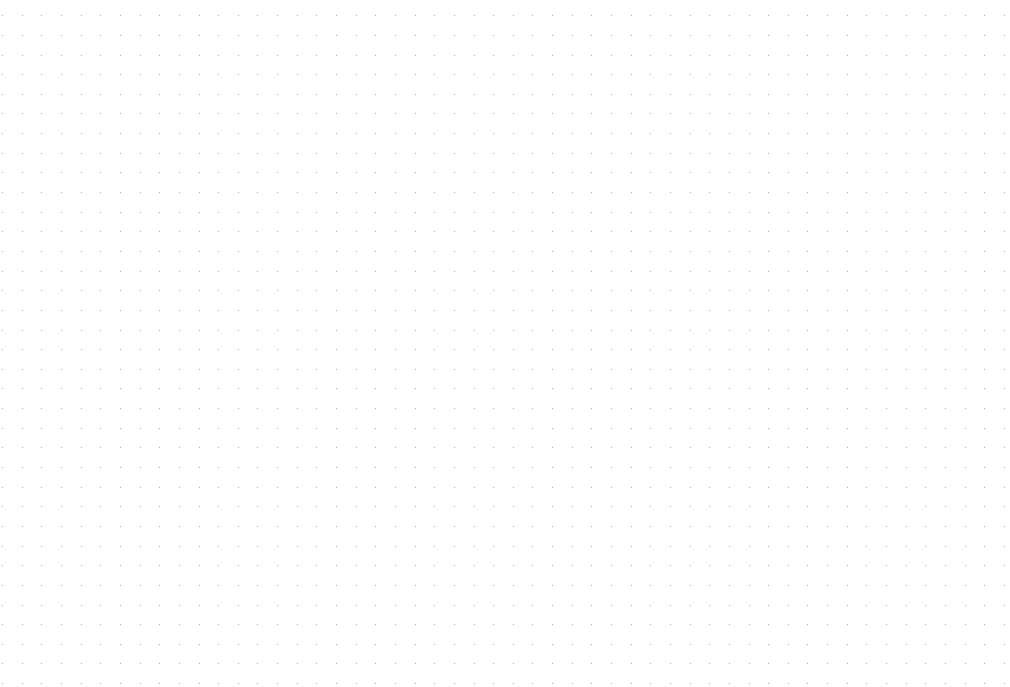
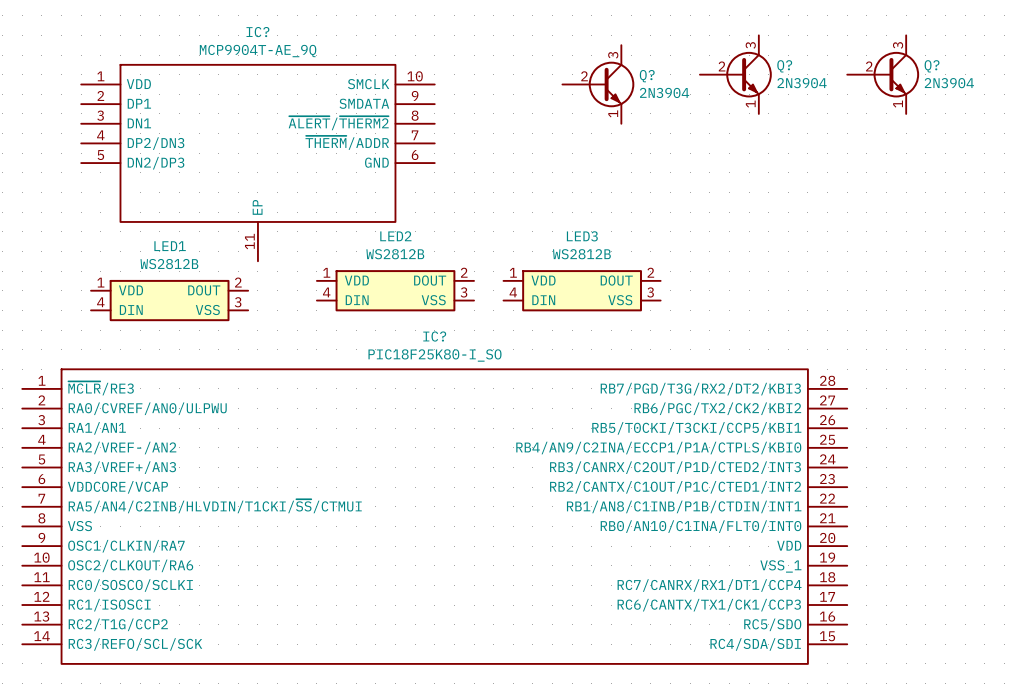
Q?: none -> 2N3904 (735, 74)
Q?: none -> 2N3904 (883, 74)
Q?: none -> 2N3904 (598, 84)
IC?: none -> MCP9904T-AE_9Q (257, 162)
LED2: none -> WS2812B (395, 290)
LED3: none -> WS2812B (582, 290)
LED1: none -> WS2812B (169, 300)
IC?: none -> PIC18F25K80-I_SO (434, 516)

